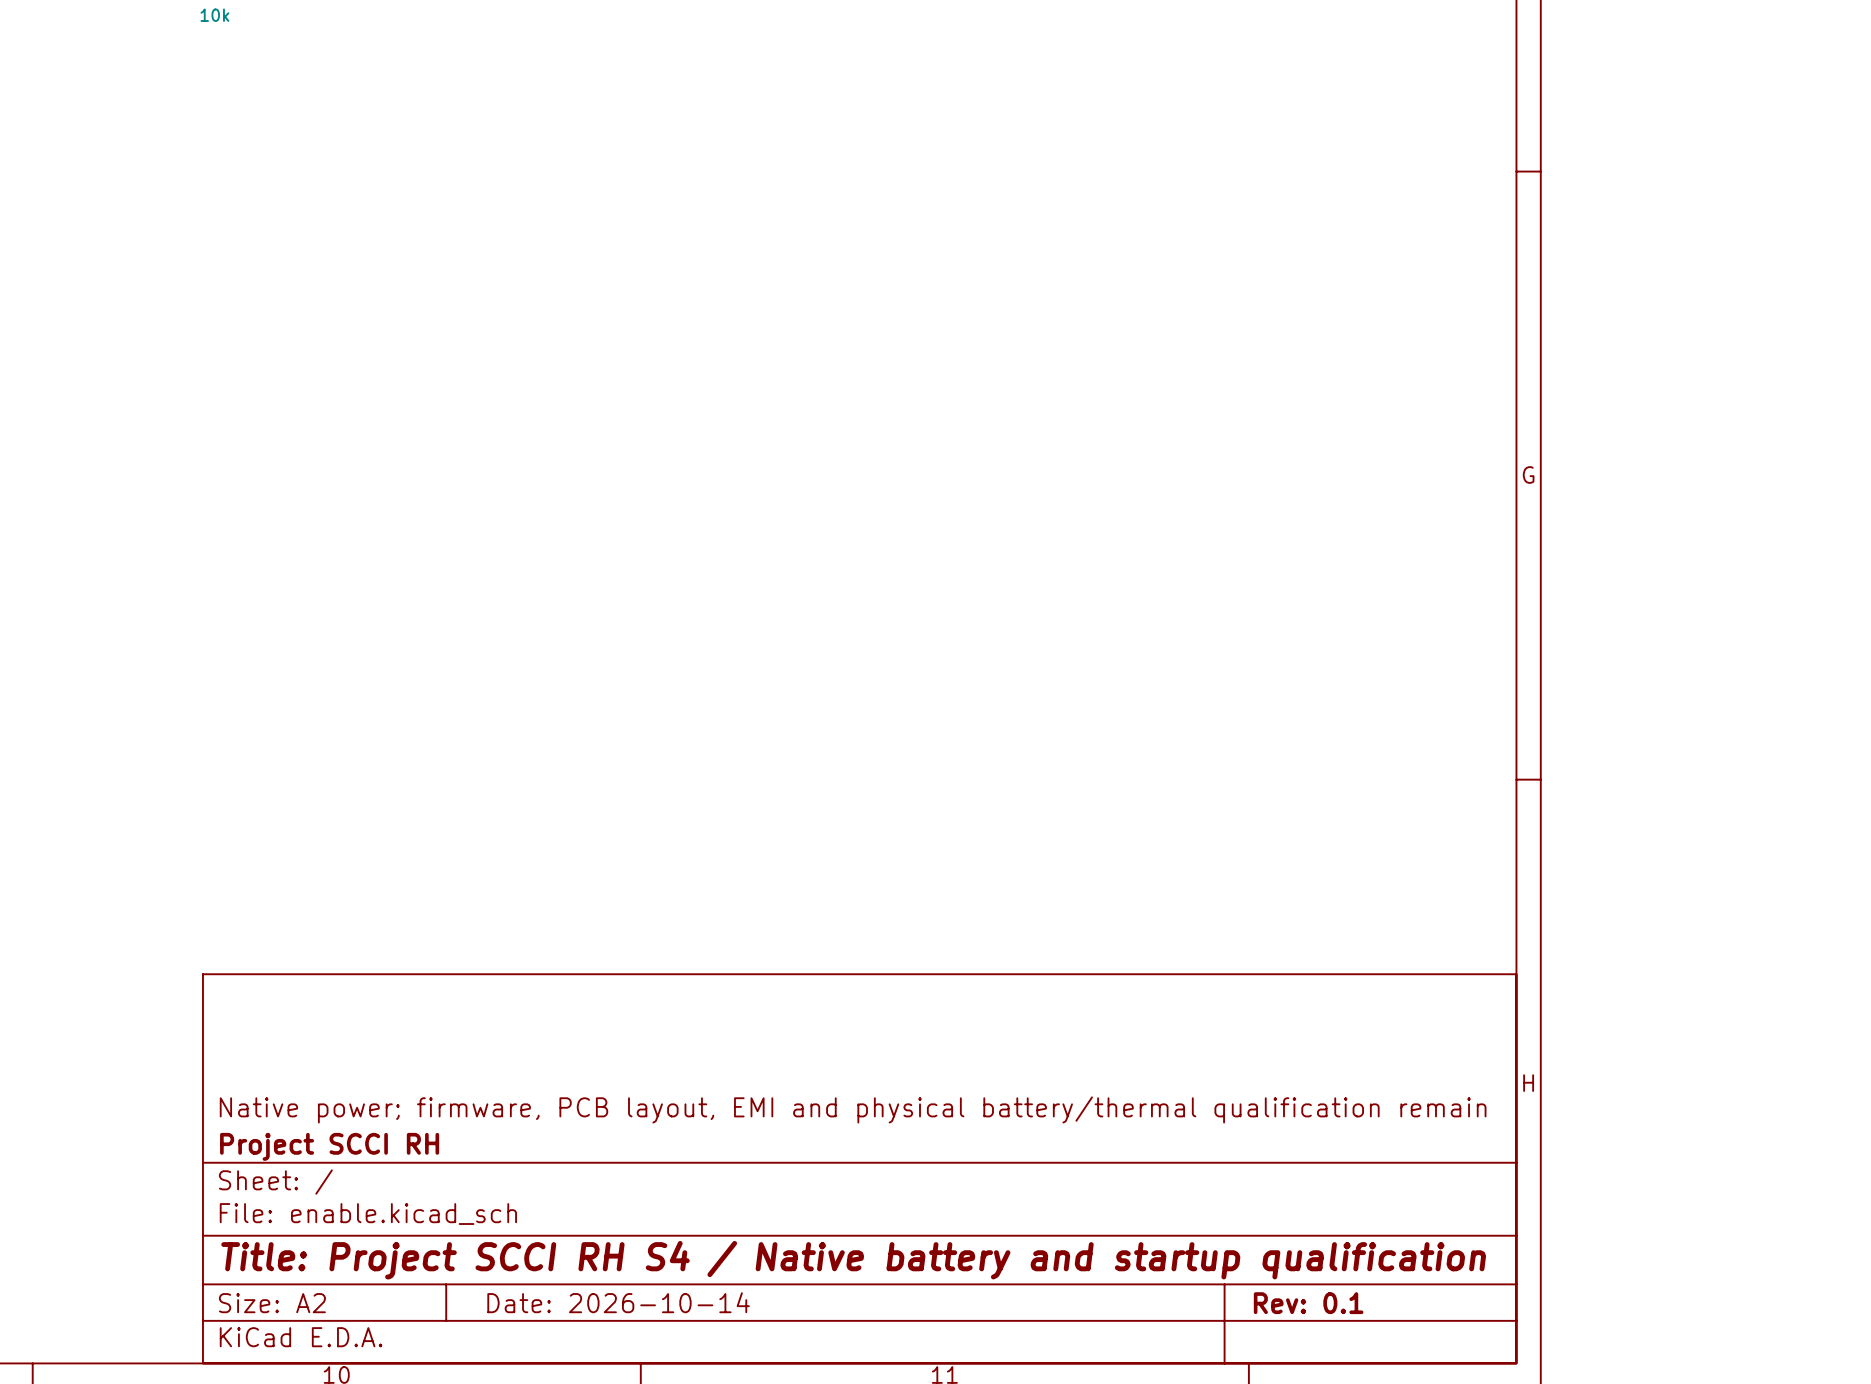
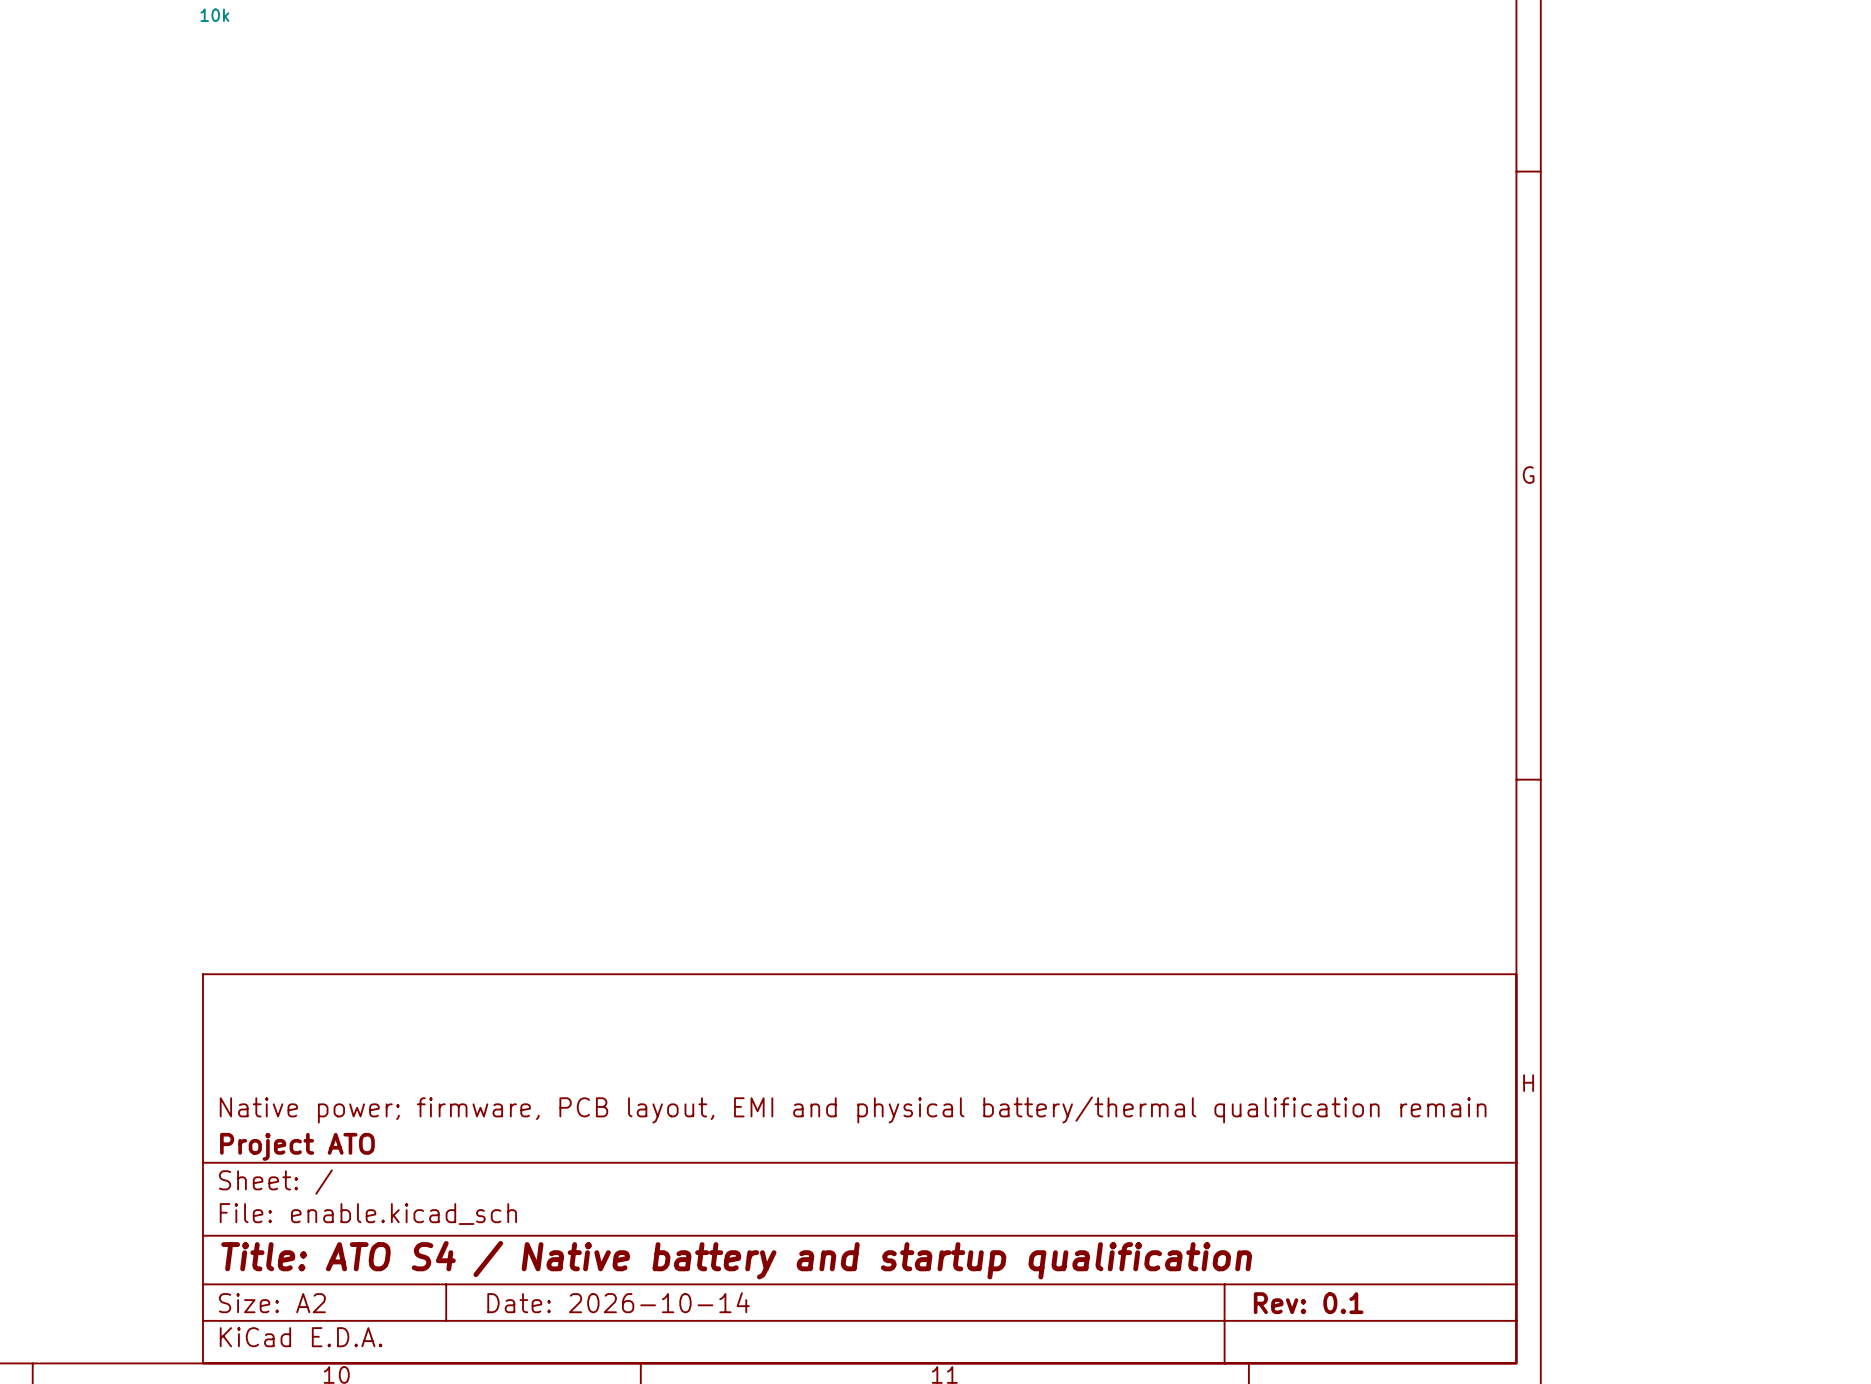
title block: Project SCCI RH (329, 1146) -> Project ATO (297, 1146)
title block: Title: Project SCCI RH S4 / Native battery and startup qualification (853, 1260) -> Title: ATO S4 / Native battery and startup qualification (736, 1260)

